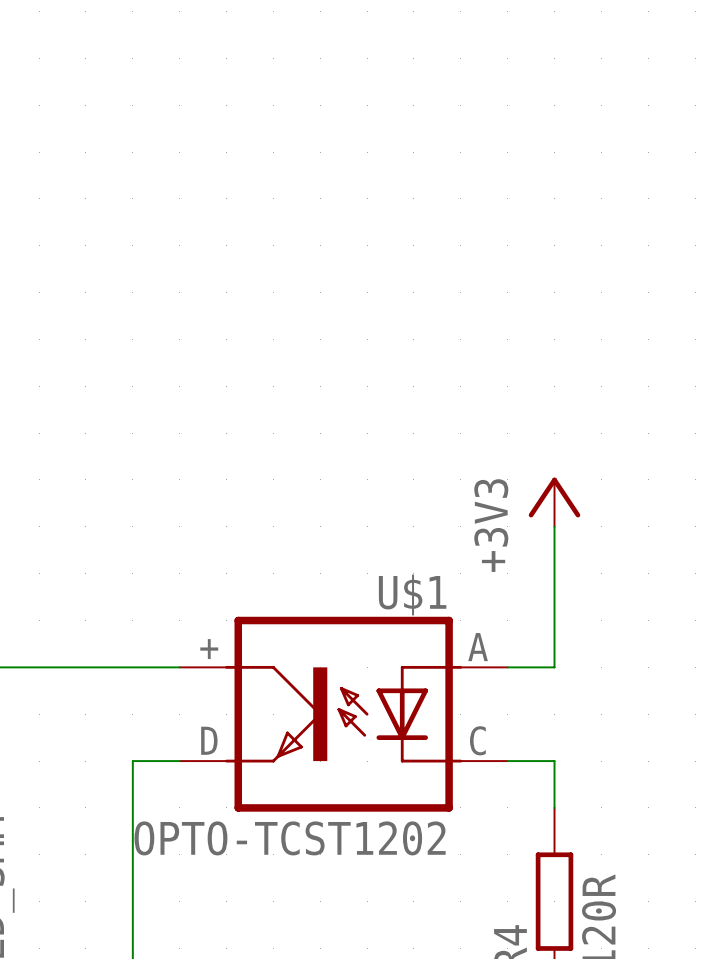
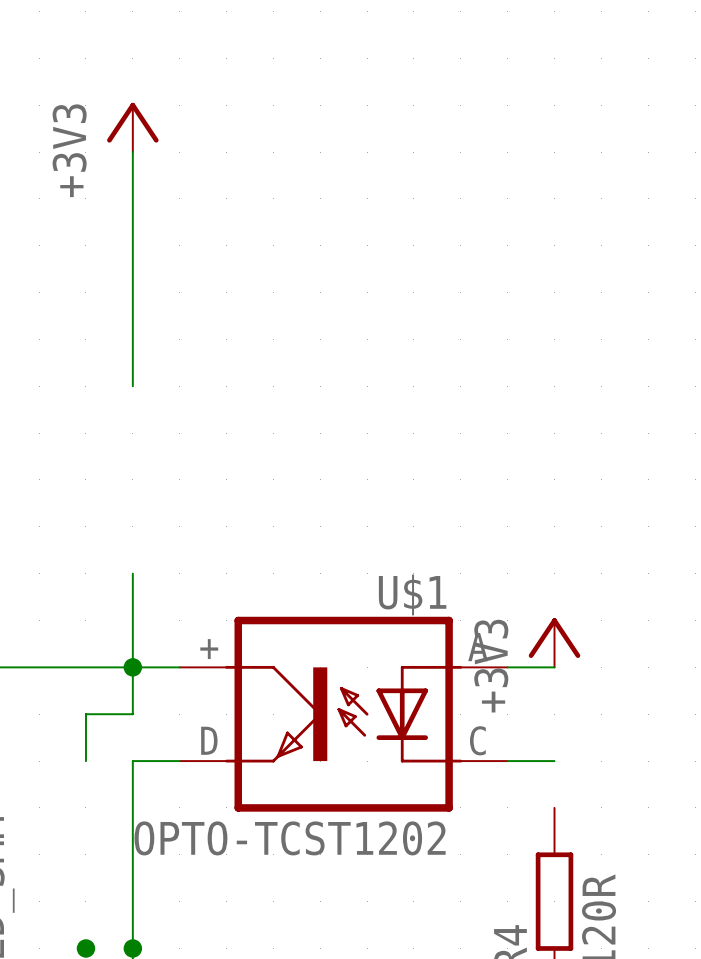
power symbol: none -> +3V3 (132, 127)
wire: none -> (132, 152) (132, 386)
power symbol position: +3V3 (554, 502) -> +3V3 (554, 642)
wire: (554, 526) (554, 667) -> none
wire: none -> (132, 573) (132, 714) (85, 714) (85, 761)
junction: none -> (132, 667)
wire: (554, 761) (554, 807) -> none
junction: none -> (85, 948)
junction: none -> (132, 948)

